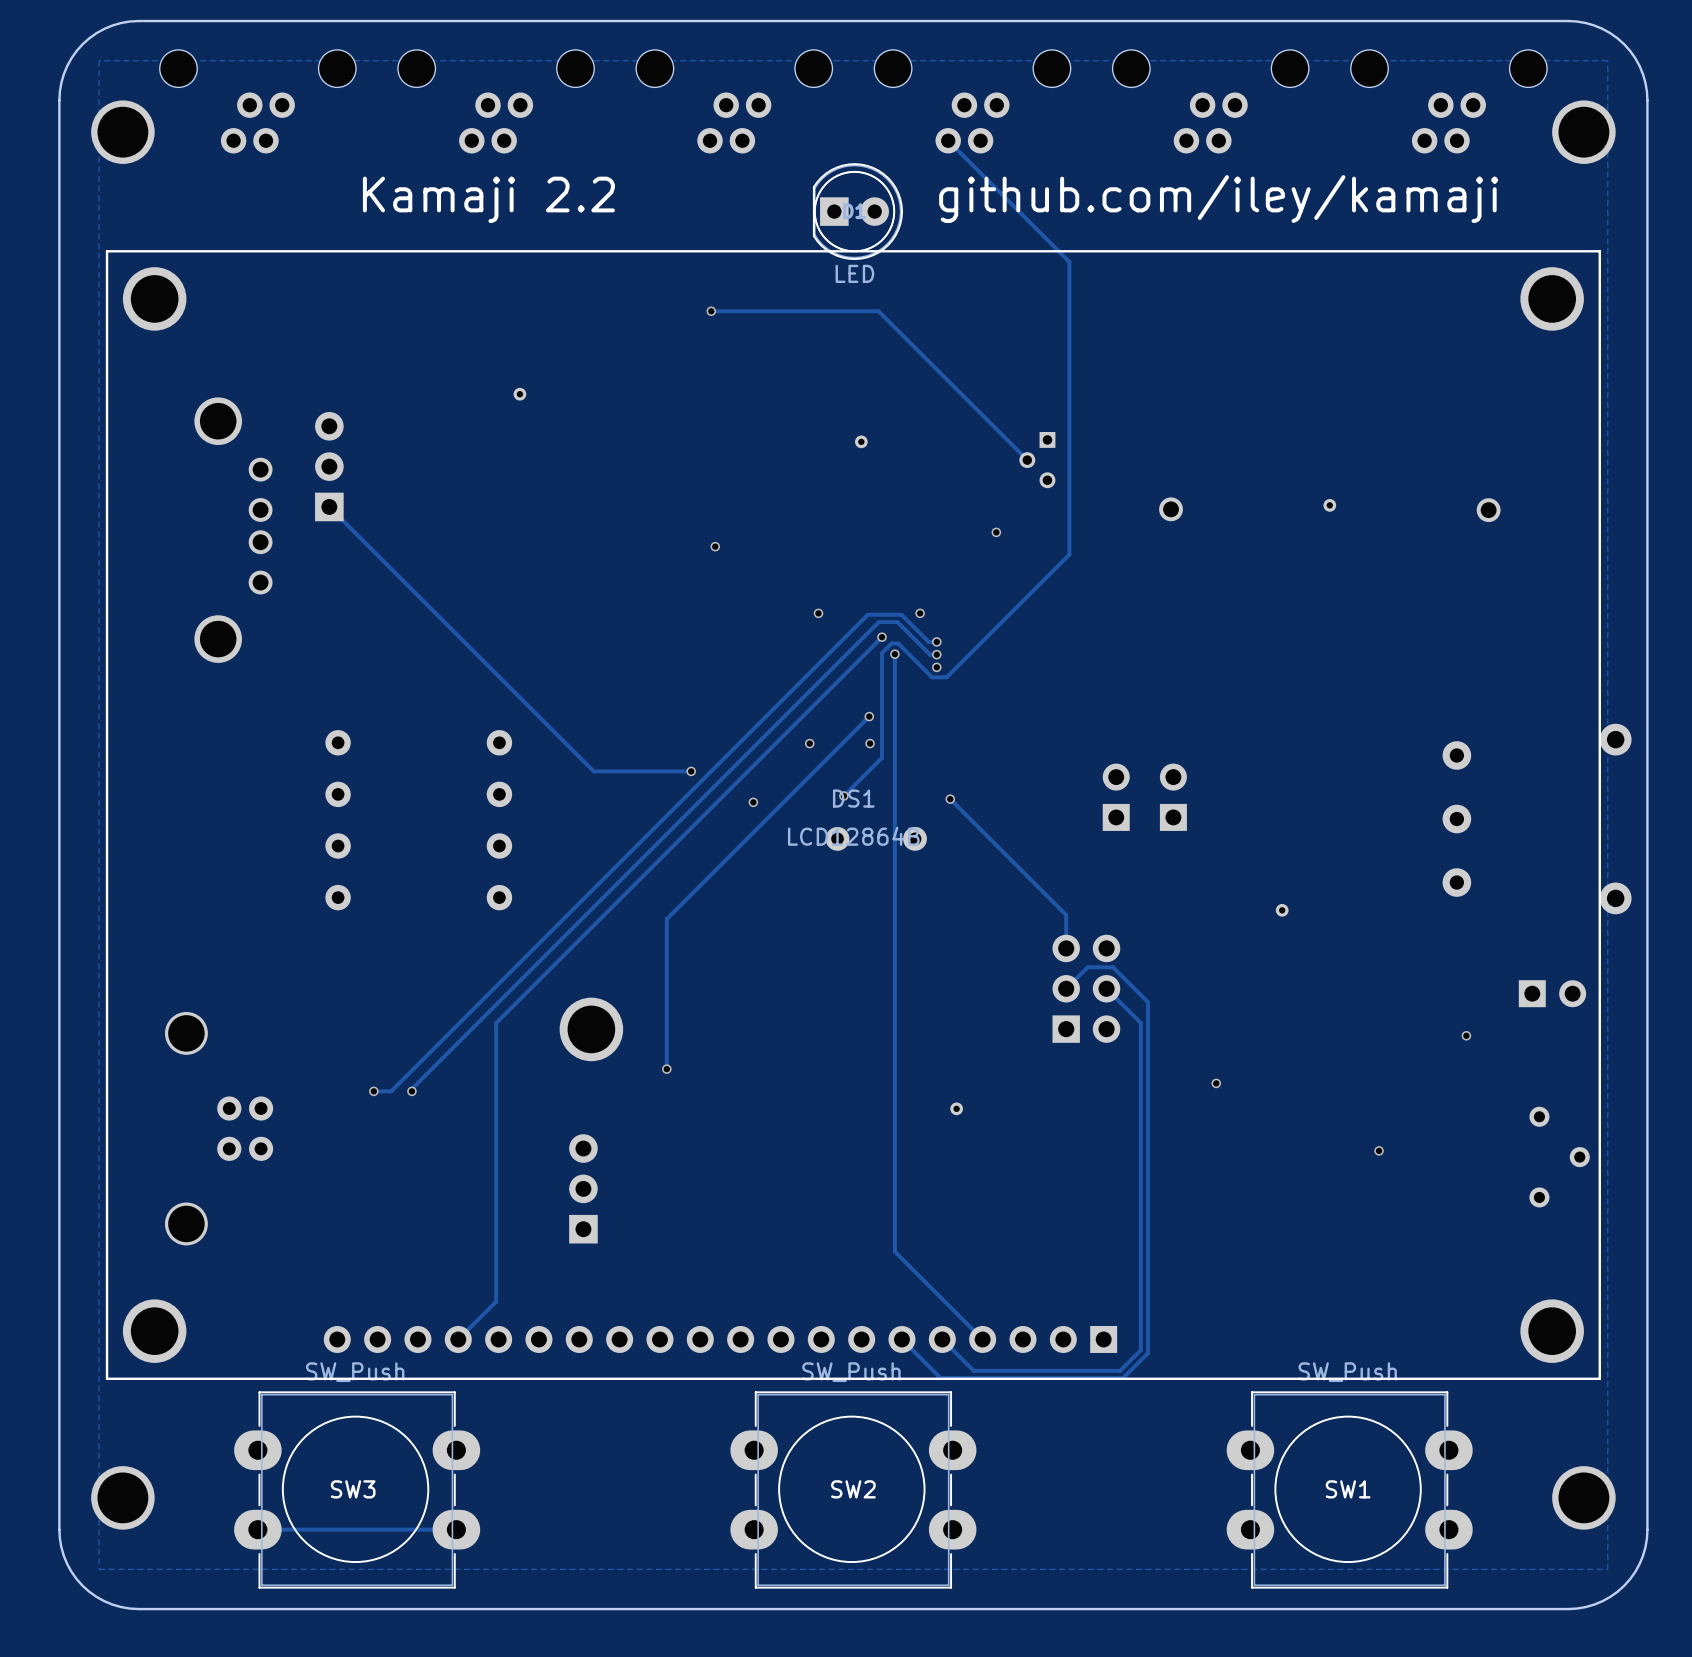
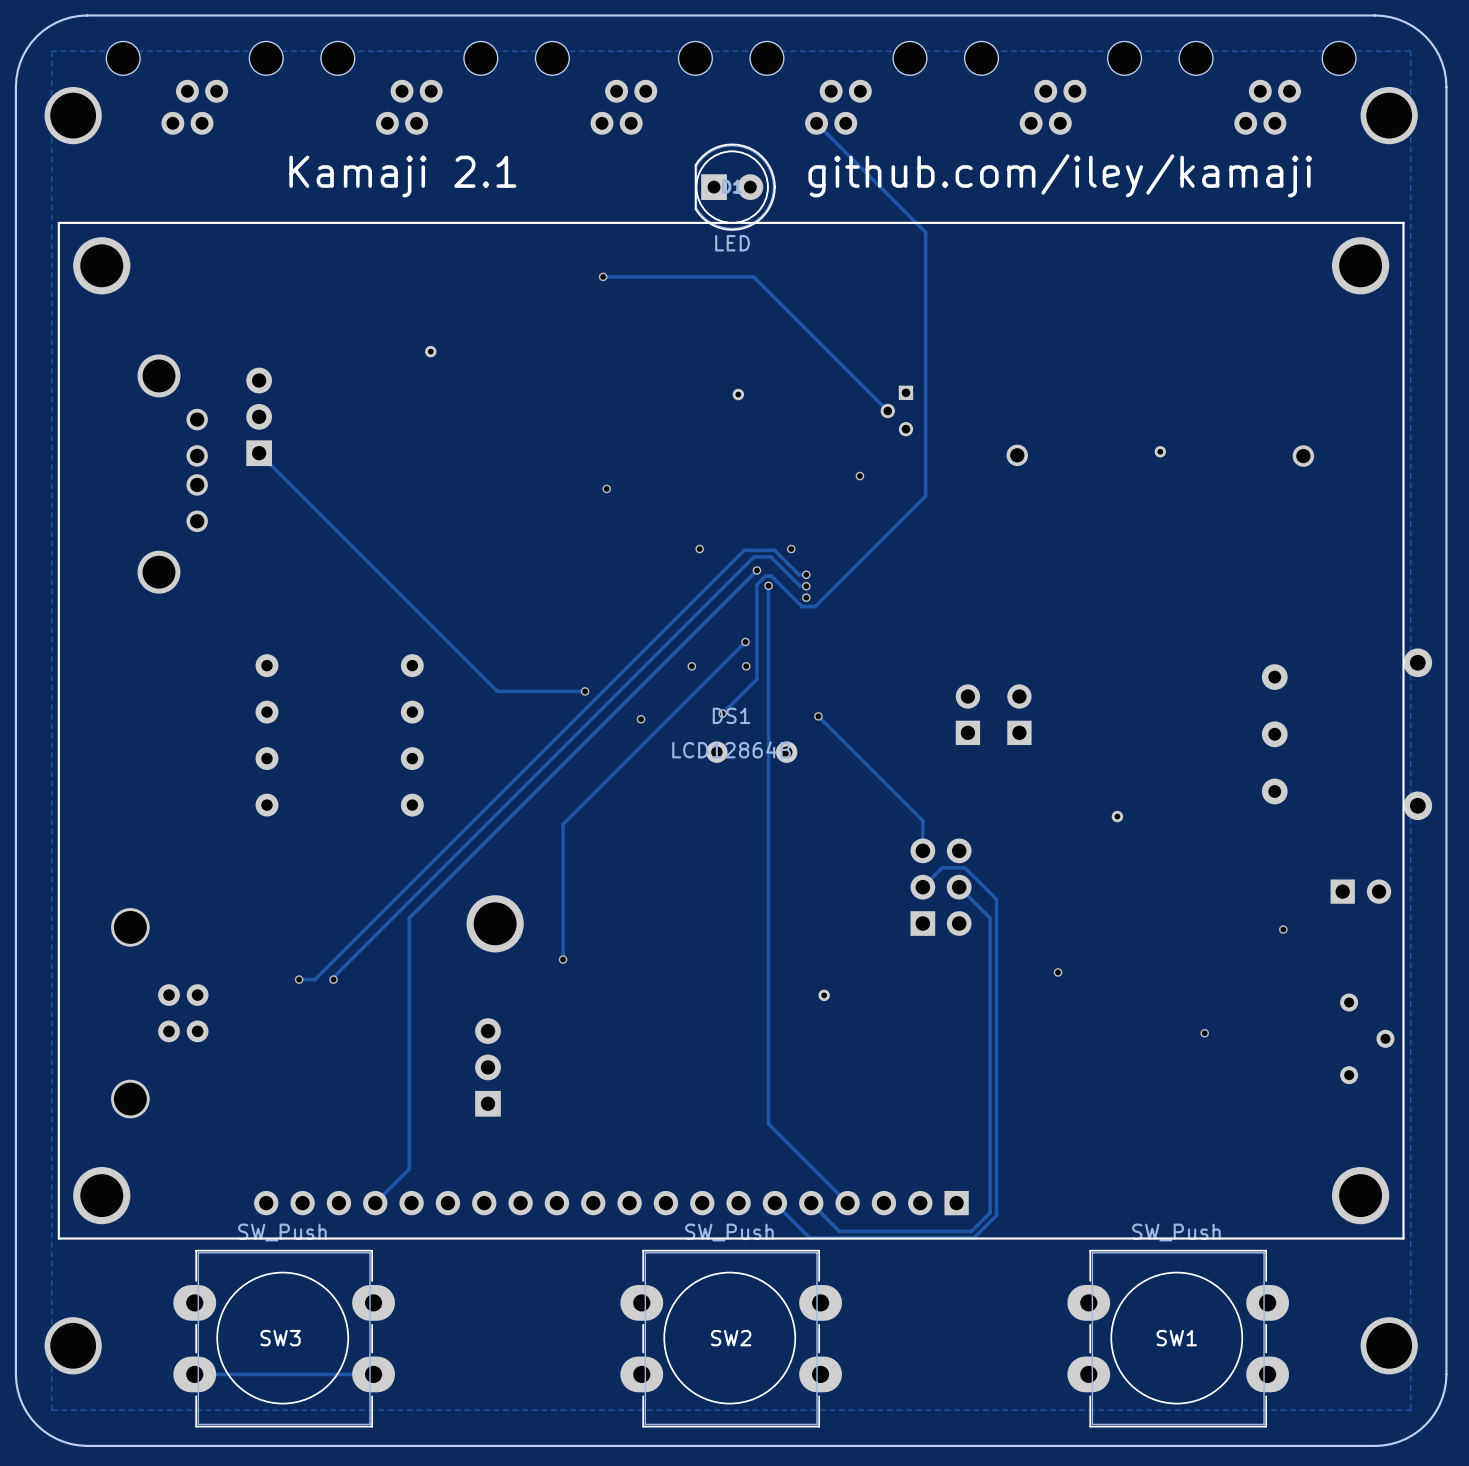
text: Kamaji 2.2 (488, 199) -> Kamaji 2.1 (402, 176)

